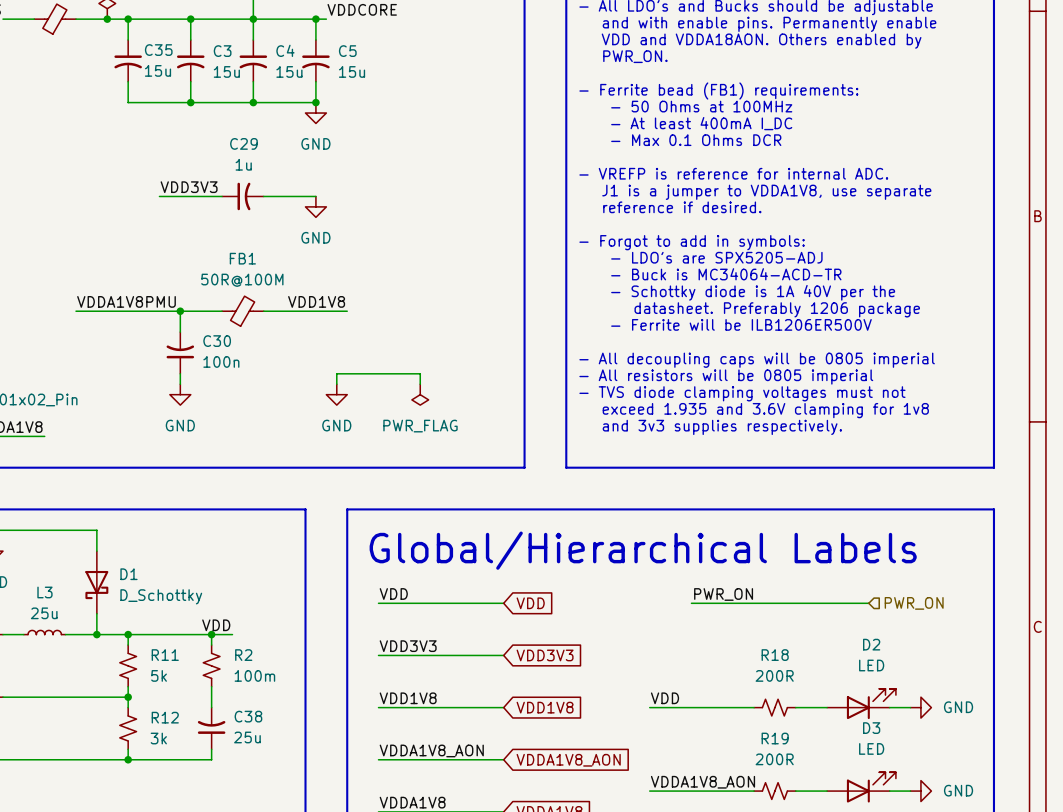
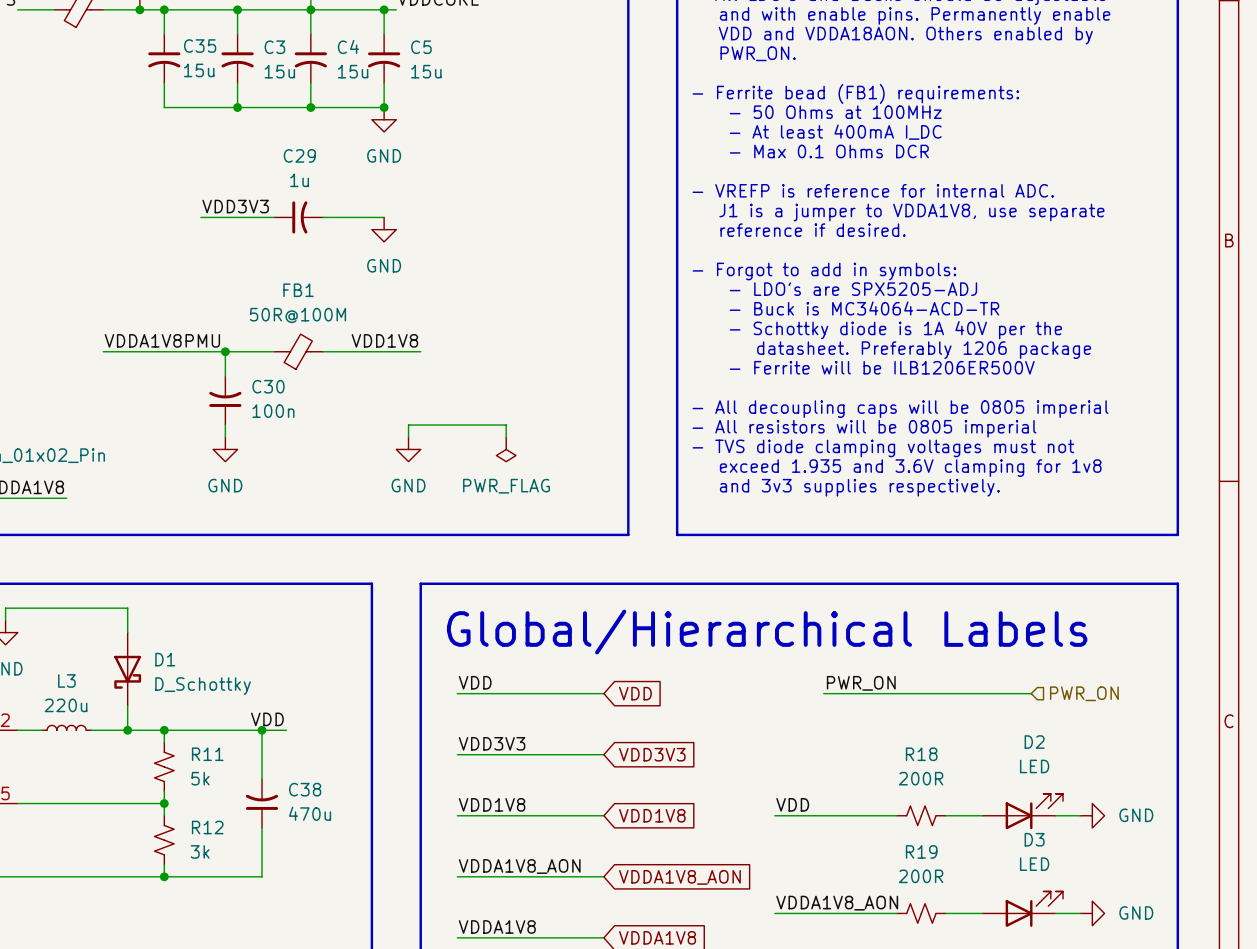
L3 value: 25u (44, 613) -> 220u (66, 705)
wire: none -> (262, 742) (262, 779)
R2: 100m (211, 665) -> none
C38 position: (211, 728) -> (262, 803)
C38 value: 25u (247, 737) -> 470u (310, 813)

